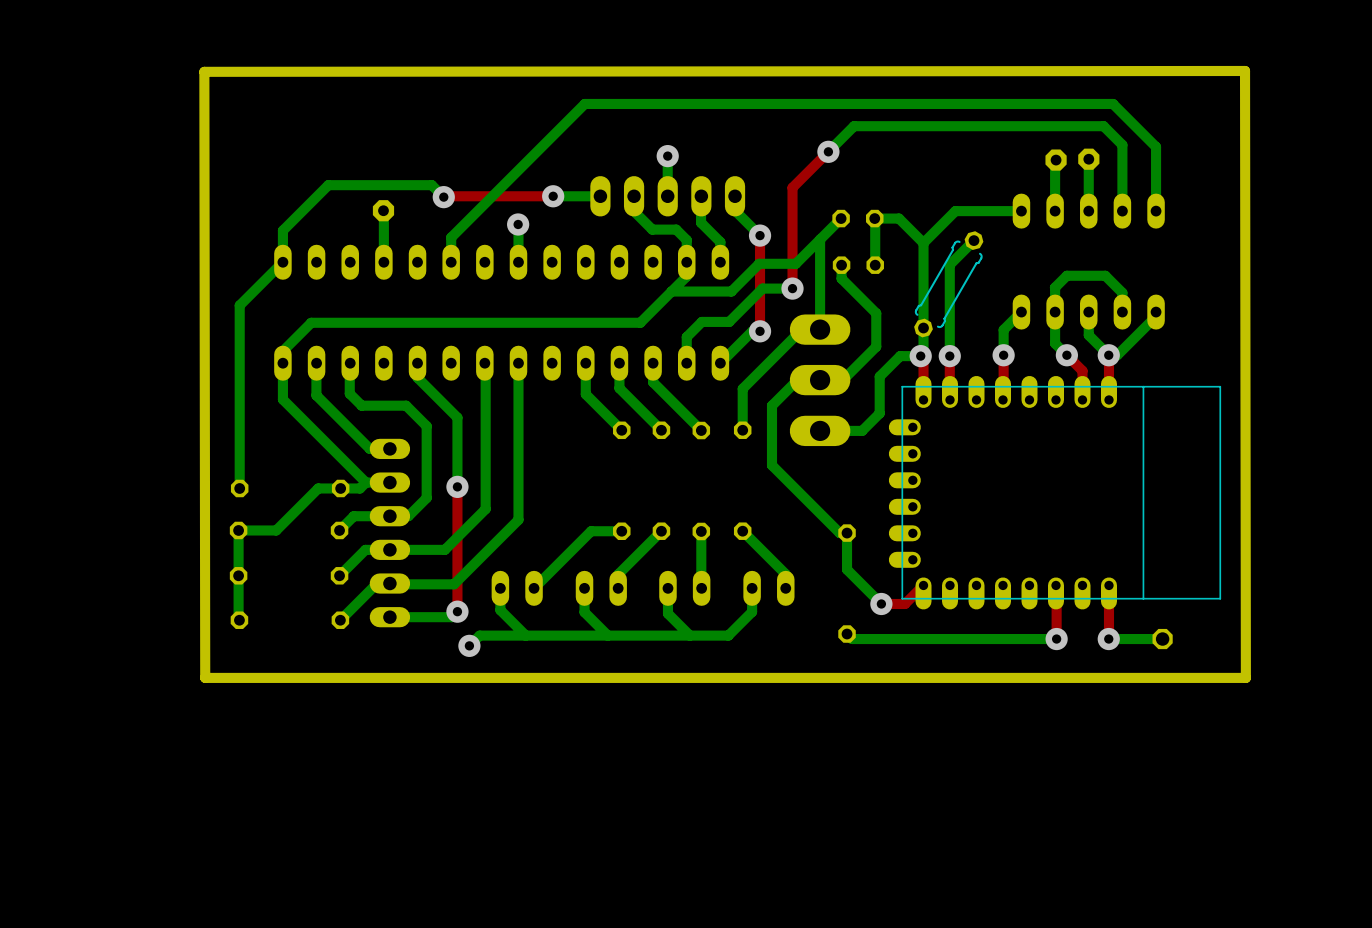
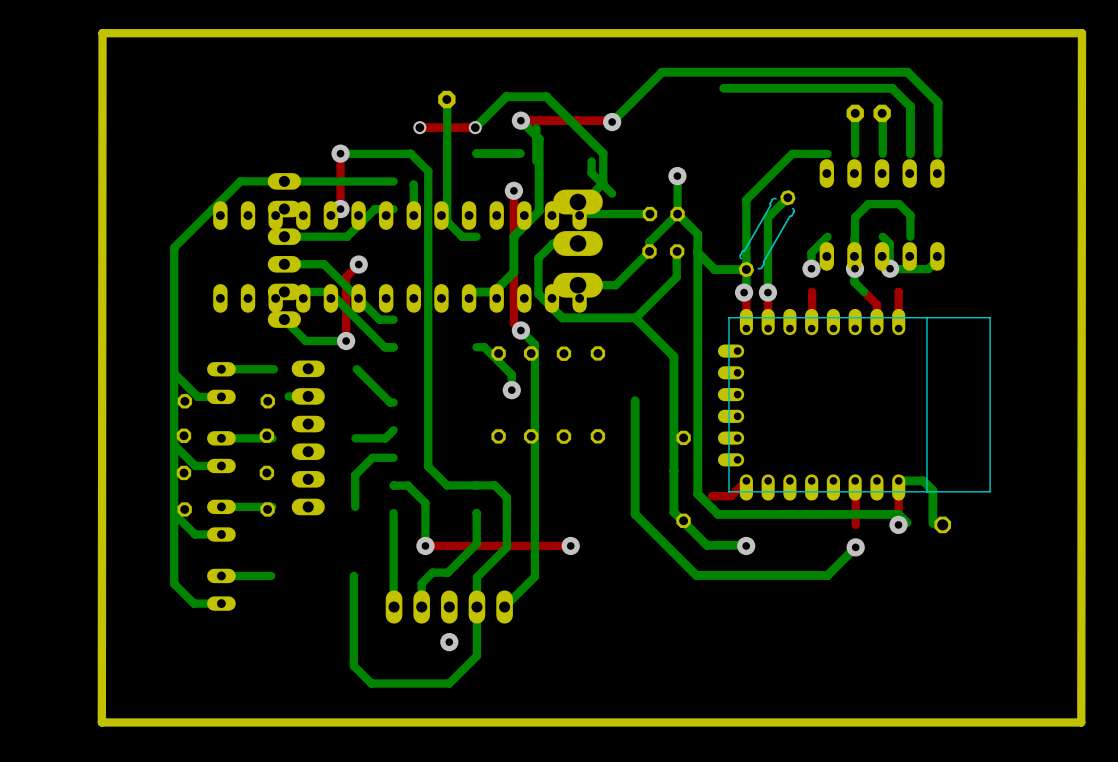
board edge: (1245, 70) (204, 71) (205, 677) (1245, 677) (1245, 70) -> (1082, 33) (1081, 722) (101, 722) (102, 33) (1082, 33)
bottom track: none -> (723, 88) (892, 88) (910, 106) (910, 153)
bottom track: none -> (446, 99) (447, 221) (462, 236) (476, 236)
bottom track: none -> (855, 113) (855, 153)
part: none -> (855, 113)
bottom track: none -> (882, 113) (882, 153)
part: none -> (882, 113)
bottom track: none -> (520, 120) (539, 138) (539, 211) (513, 236) (513, 272) (494, 292) (476, 292)
top track: none -> (520, 120) (612, 122)
bottom track: none -> (612, 122) (661, 72) (907, 72) (938, 102) (938, 153)
via: none -> (612, 122)
bottom track: (828, 151) (854, 126) (1103, 126) (1122, 144) (1122, 211) -> none
top track: (828, 151) (792, 187) (792, 288) -> none
via: (828, 151) -> none
via: none -> (419, 127)
bottom track: none -> (475, 127) (506, 96) (546, 96) (603, 153) (603, 183) (584, 202) (577, 202) (589, 214) (649, 214)
top track: none -> (475, 127) (419, 127)
via: none -> (475, 127)
via position: (667, 156) -> (520, 120)
bottom track: (1088, 159) (1088, 211) -> none
part: (1088, 159) -> none
bottom track: (1056, 160) (1055, 211) -> none
part: (1056, 160) -> none
bottom track: none -> (340, 153) (410, 153) (428, 171) (428, 466) (447, 485) (494, 485) (506, 497) (506, 547) (476, 577) (476, 655) (449, 683) (371, 683) (353, 665) (354, 575)
top track: none -> (340, 153) (340, 209)
bottom track: none -> (520, 153) (476, 153)
top track: (553, 196) (443, 197) -> none
via: (553, 196) -> none
bottom track: (600, 196) (553, 196) -> none
bottom track: (634, 196) (634, 211) (652, 229) (676, 229) (686, 240) (686, 276) (640, 322) (311, 322) (282, 351) (282, 399) (365, 482) (360, 488) (318, 488) (276, 530) (238, 530) (239, 620) -> none
part: (667, 196) -> none
bottom track: (701, 196) (701, 222) (720, 242) (720, 262) -> none
bottom track: (443, 197) (431, 185) (328, 185) (282, 230) (282, 262) (239, 305) (239, 488) -> none
via position: (443, 197) -> (340, 153)
bottom track: (383, 210) (383, 262) -> none
part position: (383, 210) -> (446, 99)
bottom track: (1021, 211) (955, 211) -> (827, 153) (792, 153) (772, 173)
bottom track: (1156, 211) (1156, 146) (1113, 103) (584, 103) (451, 237) (451, 262) -> none
bottom track: none -> (677, 176) (677, 214)
via: none -> (677, 176)
bottom track: (841, 218) (795, 263) (759, 263) (731, 291) (671, 291) -> none
part: (857, 218) -> none
bottom track: none -> (284, 181) (240, 181) (174, 247) (174, 583) (193, 603) (221, 603)
bottom track: none -> (393, 181) (284, 181)
via: (518, 224) -> none
top track: none -> (513, 190) (513, 323) (520, 330)
via: none -> (513, 190)
top track: (760, 235) (760, 331) -> none
via: (760, 235) -> none
bottom track: (820, 239) (820, 329) (801, 329) (742, 388) (742, 430) -> none
bottom track: (923, 243) (899, 218) (874, 218) (875, 265) -> none
via: none -> (340, 209)
bottom track: none -> (393, 209) (374, 209) (347, 236) (284, 236)
part: none -> (663, 214)
bottom track: none -> (677, 214) (649, 242) (649, 251) (615, 285) (577, 285)
bottom track: none -> (677, 214) (697, 234) (697, 494) (718, 514) (898, 514) (906, 522)
bottom track: none -> (910, 215) (899, 204) (868, 204) (855, 217) (855, 268)
bottom track: none -> (910, 215) (910, 236)
bottom track: (841, 265) (841, 278) (876, 313) (876, 346) (842, 380) (797, 380) (771, 405) (771, 465) (839, 533) (847, 533) (847, 569) (881, 603) -> none
part: (858, 265) -> none
bottom track: (1054, 287) (1066, 275) (1105, 275) (1122, 292) (1122, 312) -> none
bottom track: (792, 288) (762, 288) (729, 321) (701, 321) (686, 337) (686, 363) -> none
via: (792, 288) -> none
bottom track: none -> (827, 236) (811, 252) (811, 268)
bottom track: none -> (882, 236) (889, 243) (889, 269)
bottom track: none -> (577, 243) (553, 243) (538, 258) (538, 293) (562, 317) (635, 317)
part: none -> (284, 250)
part: none -> (663, 251)
bottom track: none -> (676, 251) (676, 277) (635, 317)
bottom track: none -> (697, 252) (714, 269) (746, 269)
bottom track: (1021, 312) (1003, 329) (1003, 355) -> none
bottom track: (1088, 312) (1088, 335) (1108, 355) (1117, 355) (1145, 327) -> (889, 269) (928, 269)
bottom track: none -> (284, 264) (324, 264) (379, 319) (393, 319)
top track: none -> (358, 264) (346, 277) (346, 341)
via: none -> (358, 264)
via: none -> (855, 268)
via: none -> (890, 268)
bottom track: (760, 331) (752, 331) (720, 363) -> none
via: (760, 331) -> none
bottom track: none -> (284, 291) (329, 291) (384, 347) (393, 347)
via position: (1003, 355) -> (811, 268)
via: (1066, 355) -> none
via: (1108, 355) -> none
bottom track: (920, 356) (900, 356) (879, 376) (879, 413) (862, 430) (820, 430) -> none
bottom track: (316, 363) (316, 395) (369, 448) (389, 448) -> none
bottom track: (350, 363) (349, 393) (361, 405) (406, 405) (426, 426) (426, 498) (408, 516) (353, 516) (339, 530) -> none
bottom track: (417, 363) (417, 377) (457, 417) (457, 486) -> none
bottom track: (484, 363) (485, 509) (444, 549) (365, 549) (339, 575) -> none
bottom track: (518, 363) (518, 519) (454, 584) (377, 583) (340, 620) -> none
bottom track: (585, 363) (585, 394) (621, 430) -> none
bottom track: (619, 363) (619, 388) (661, 430) -> none
bottom track: (653, 363) (653, 382) (701, 430) -> none
part position: (820, 380) -> (577, 243)
bottom track: none -> (635, 317) (673, 356) (673, 470)
bottom track: none -> (284, 319) (305, 341) (346, 341)
bottom track: none -> (520, 330) (534, 344) (534, 576) (504, 607)
via: none -> (520, 330)
bottom track: none -> (476, 347) (484, 347) (511, 374) (511, 390)
bottom track: none -> (273, 369) (221, 369)
bottom track: none -> (356, 369) (390, 402) (393, 402)
bottom track: none -> (174, 373) (197, 396) (221, 396)
part: none -> (221, 383)
via: none -> (511, 390)
top track: (457, 486) (457, 611) -> none
via position: (457, 486) -> (346, 341)
bottom track: none -> (635, 400) (635, 514) (696, 575) (827, 575) (855, 547)
bottom track: none -> (393, 430) (385, 438) (355, 438)
bottom track: (621, 531) (591, 531) (534, 588) -> none
bottom track: (661, 531) (618, 574) (618, 588) -> none
bottom track: (701, 531) (701, 588) -> none
bottom track: (742, 531) (785, 574) (785, 588) -> none
bottom track: none -> (272, 438) (221, 438)
bottom track: none -> (174, 444) (195, 465) (221, 465)
part: none -> (221, 452)
bottom track: none -> (393, 457) (372, 457) (355, 475) (355, 506)
bottom track: none -> (673, 470) (673, 512) (706, 545) (746, 545)
bottom track: none -> (898, 480) (923, 480) (932, 490) (932, 523)
bottom track: (500, 588) (500, 610) (525, 635) -> none
part: (517, 588) -> none
bottom track: (584, 588) (584, 612) (607, 635) -> none
part: (601, 588) -> none
bottom track: (667, 588) (667, 613) (689, 635) -> none
part: (684, 588) -> none
bottom track: (752, 588) (752, 611) (728, 635) (479, 635) (469, 645) -> none
part: (768, 588) -> none
bottom track: none -> (393, 485) (407, 485) (425, 503) (425, 545)
via: (881, 603) -> none
bottom track: (457, 611) (451, 617) (389, 617) -> none
via: (457, 611) -> none
bottom track: none -> (272, 506) (221, 506)
bottom track: none -> (393, 513) (394, 607)
bottom track: none -> (476, 513) (476, 543) (447, 572) (432, 572) (421, 583) (421, 607)
bottom track: none -> (174, 513) (195, 534) (221, 534)
part: none -> (221, 520)
bottom track: (847, 634) (852, 639) (1056, 639) -> none
via position: (1056, 639) -> (855, 547)
bottom track: (1162, 639) (1108, 639) -> none
via: (469, 645) -> none
via: none -> (425, 545)
top track: none -> (570, 545) (425, 545)
via: none -> (570, 545)
via: none -> (746, 545)
bottom track: none -> (271, 575) (221, 575)
part: none -> (221, 589)
part: none -> (449, 607)
via: none -> (449, 642)

